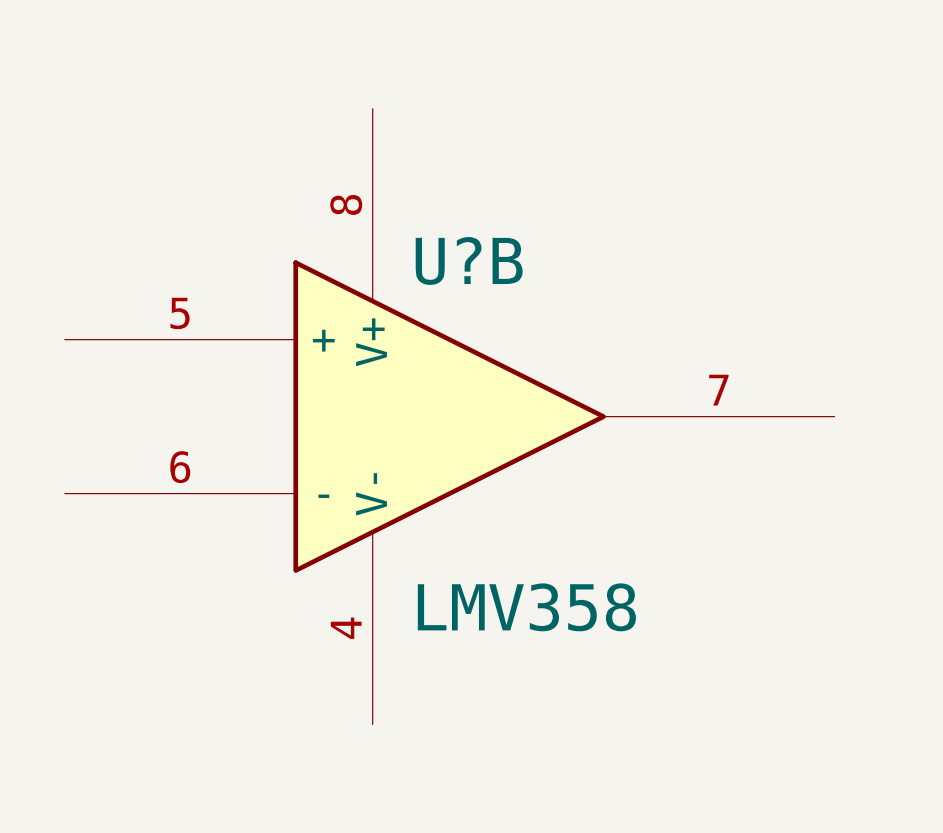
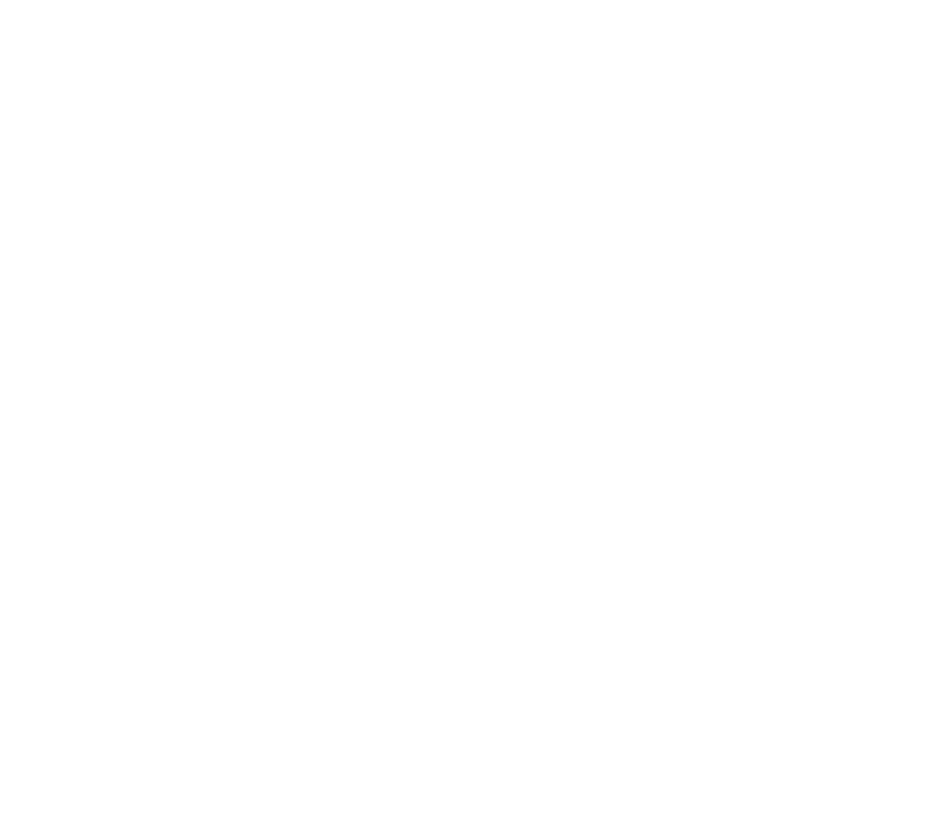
U?B: LMV358 (449, 416) -> none

